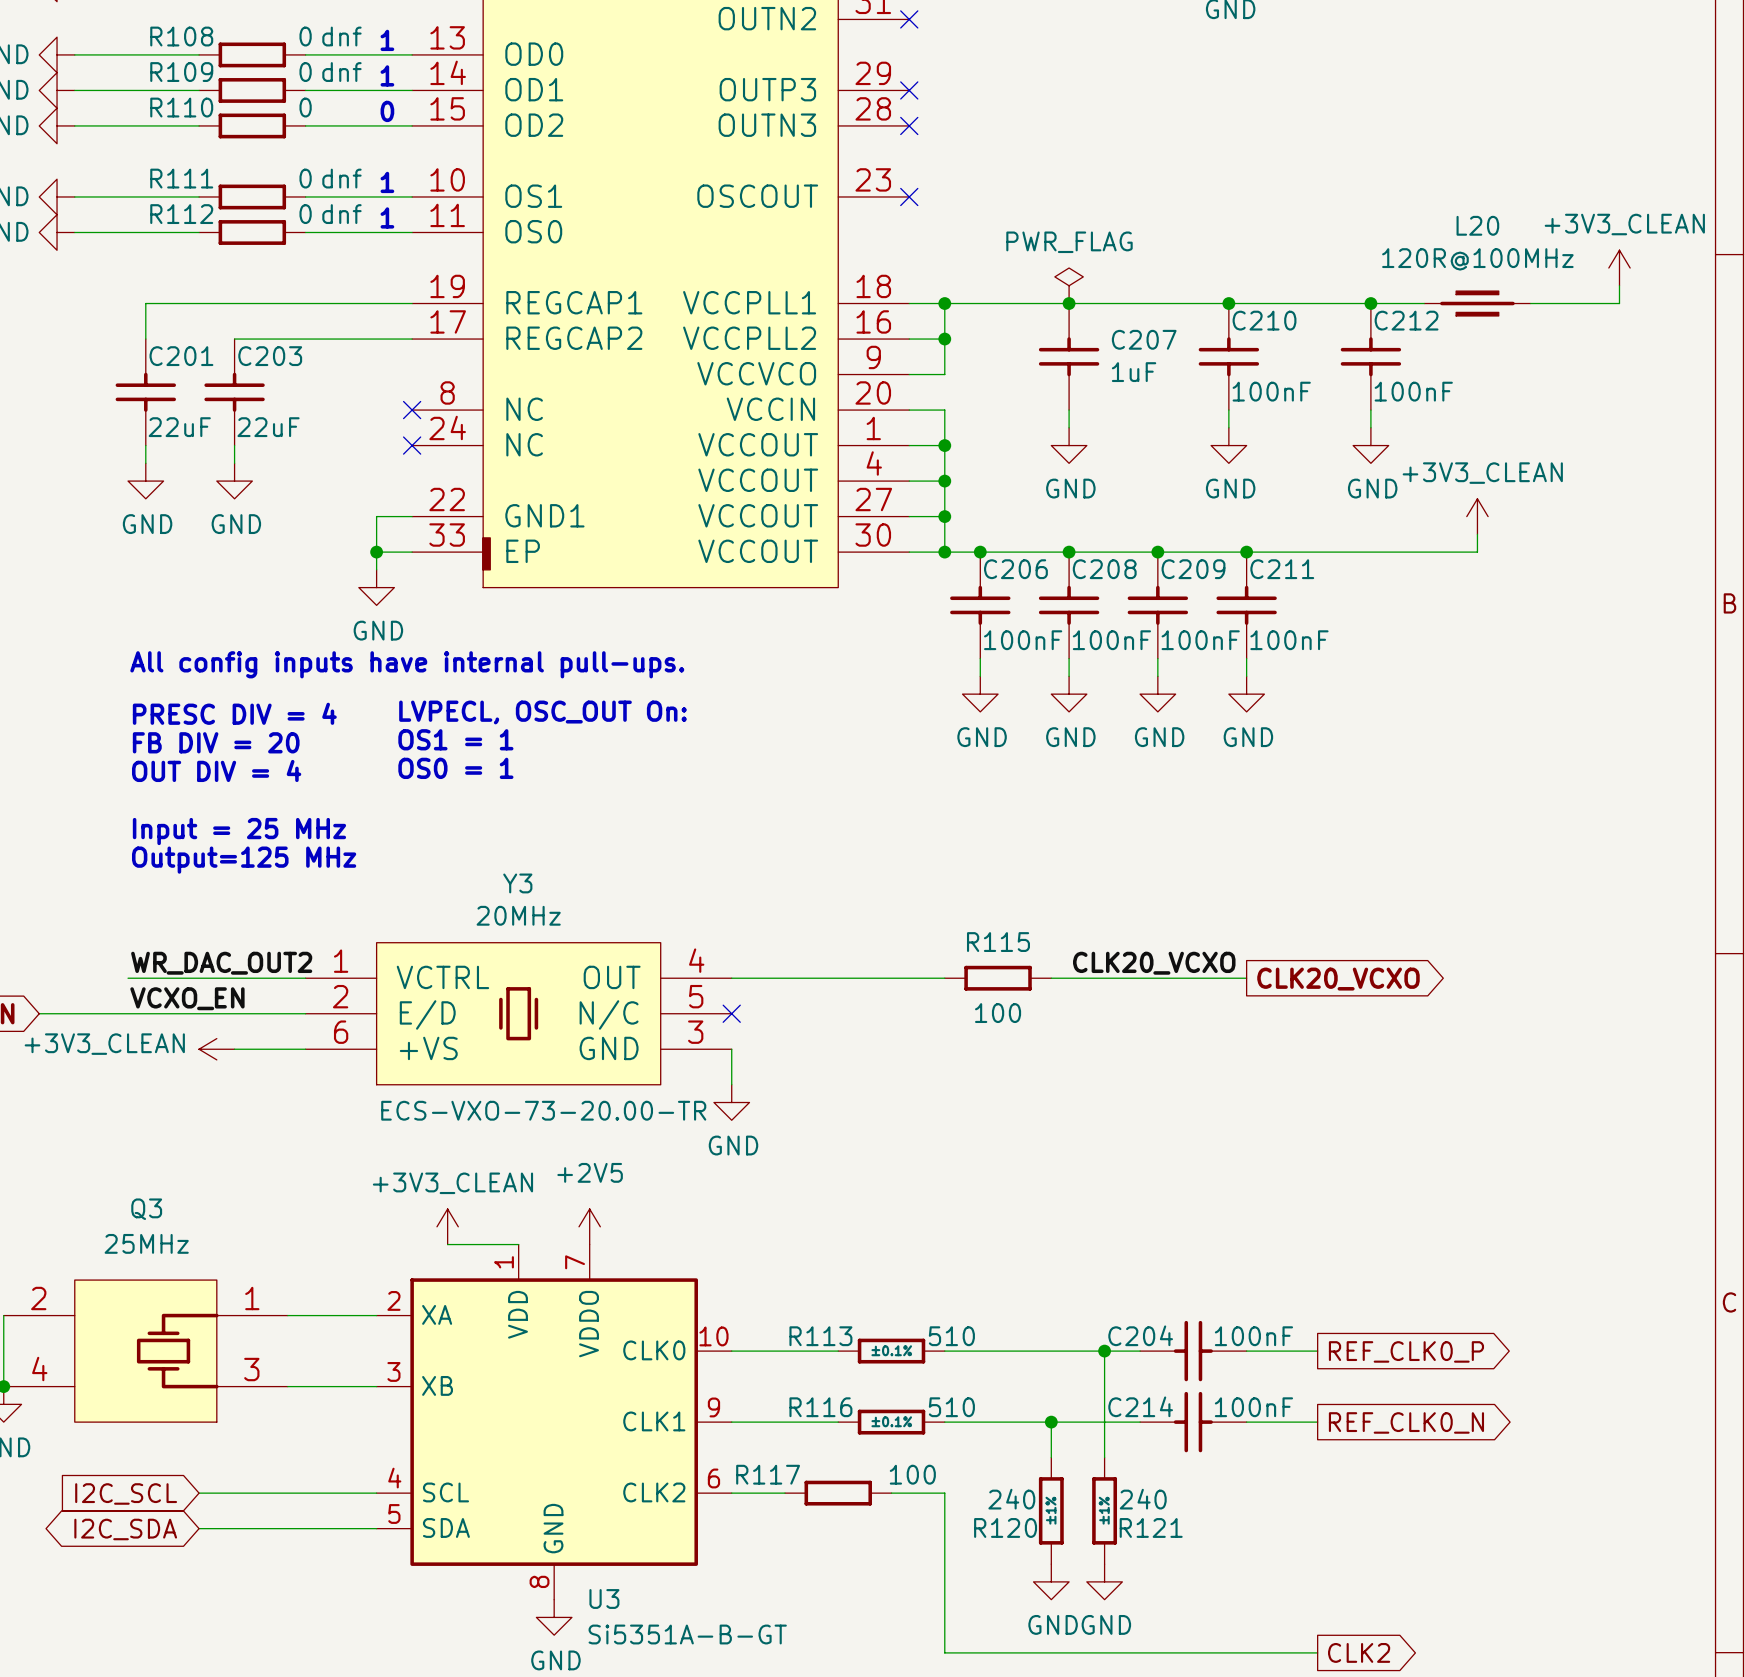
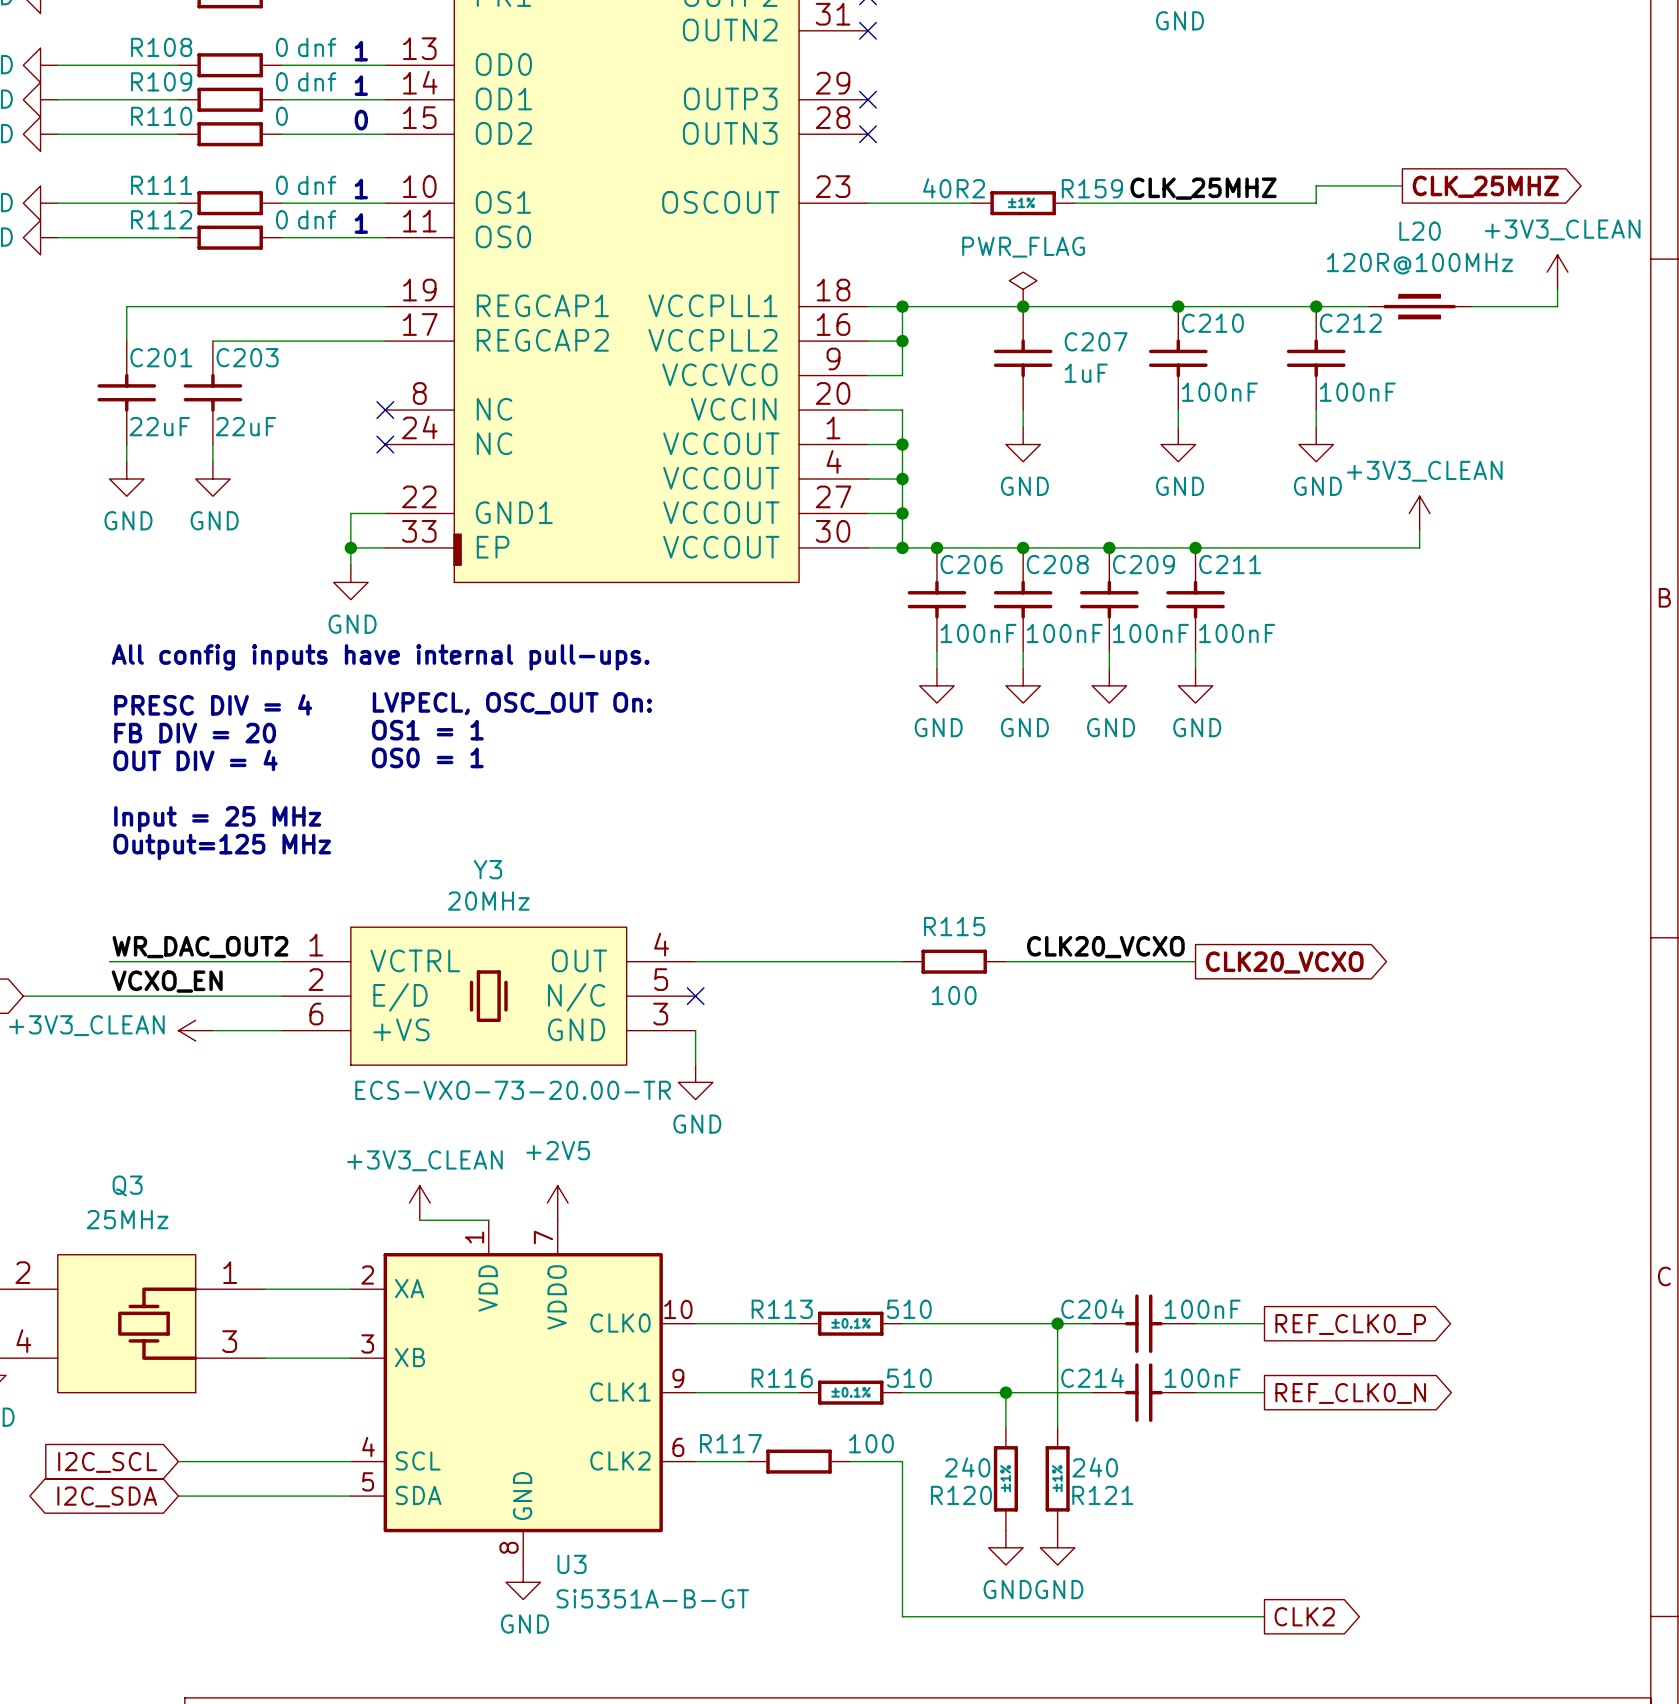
wire: none -> (1402, 185) (1316, 185) (1316, 203) (1074, 203)
global label: none -> CLK_25MHZ (1485, 186)
label: none -> CLK_25MHZ (1203, 188)
wire: none -> (868, 203) (971, 203)
no-connect mark: (909, 196) -> none
R159: none -> (1023, 203)

